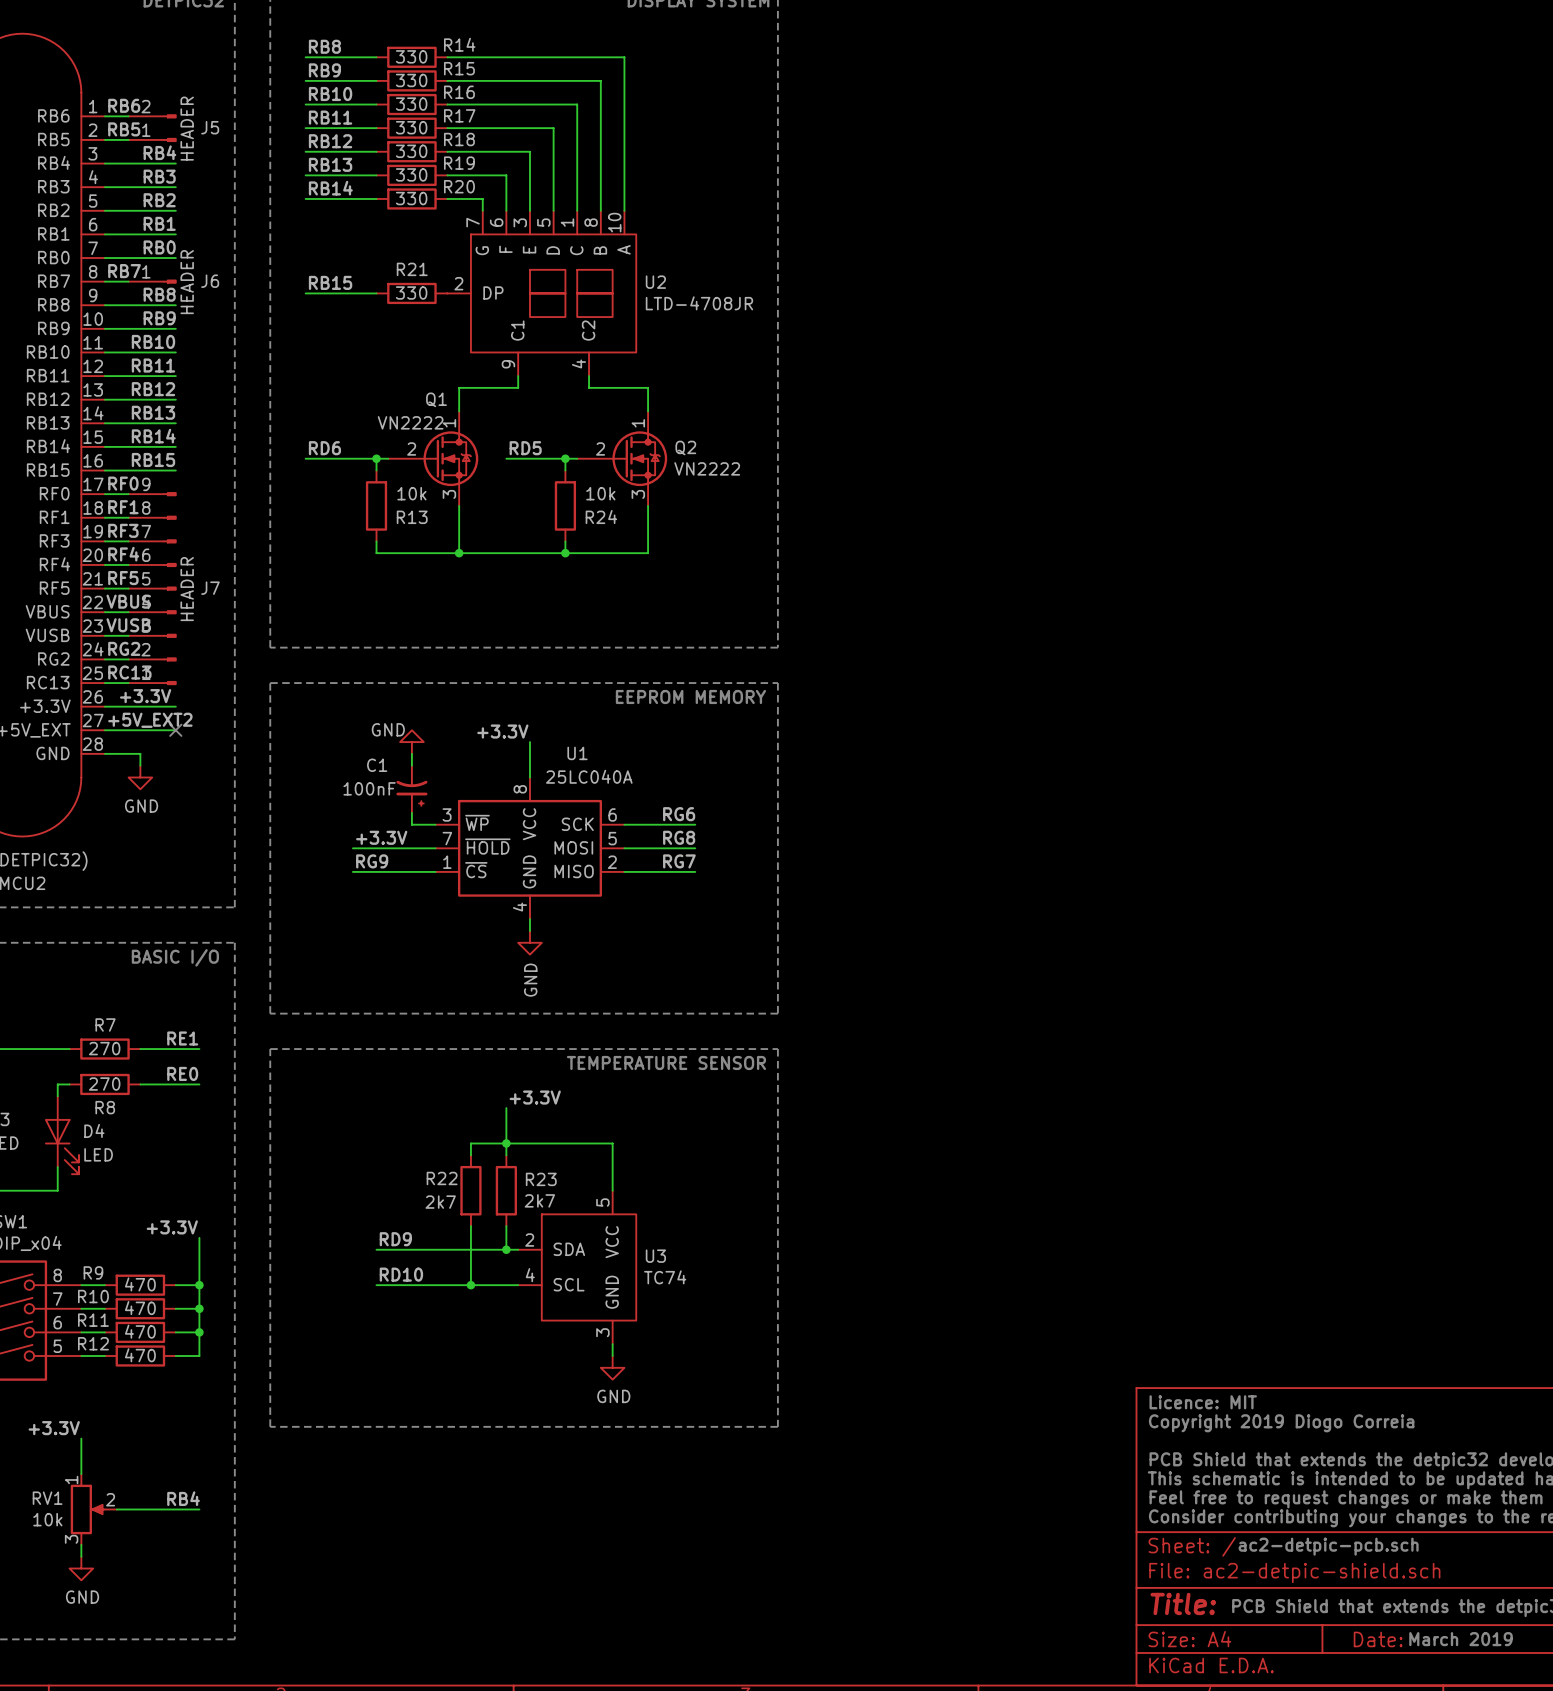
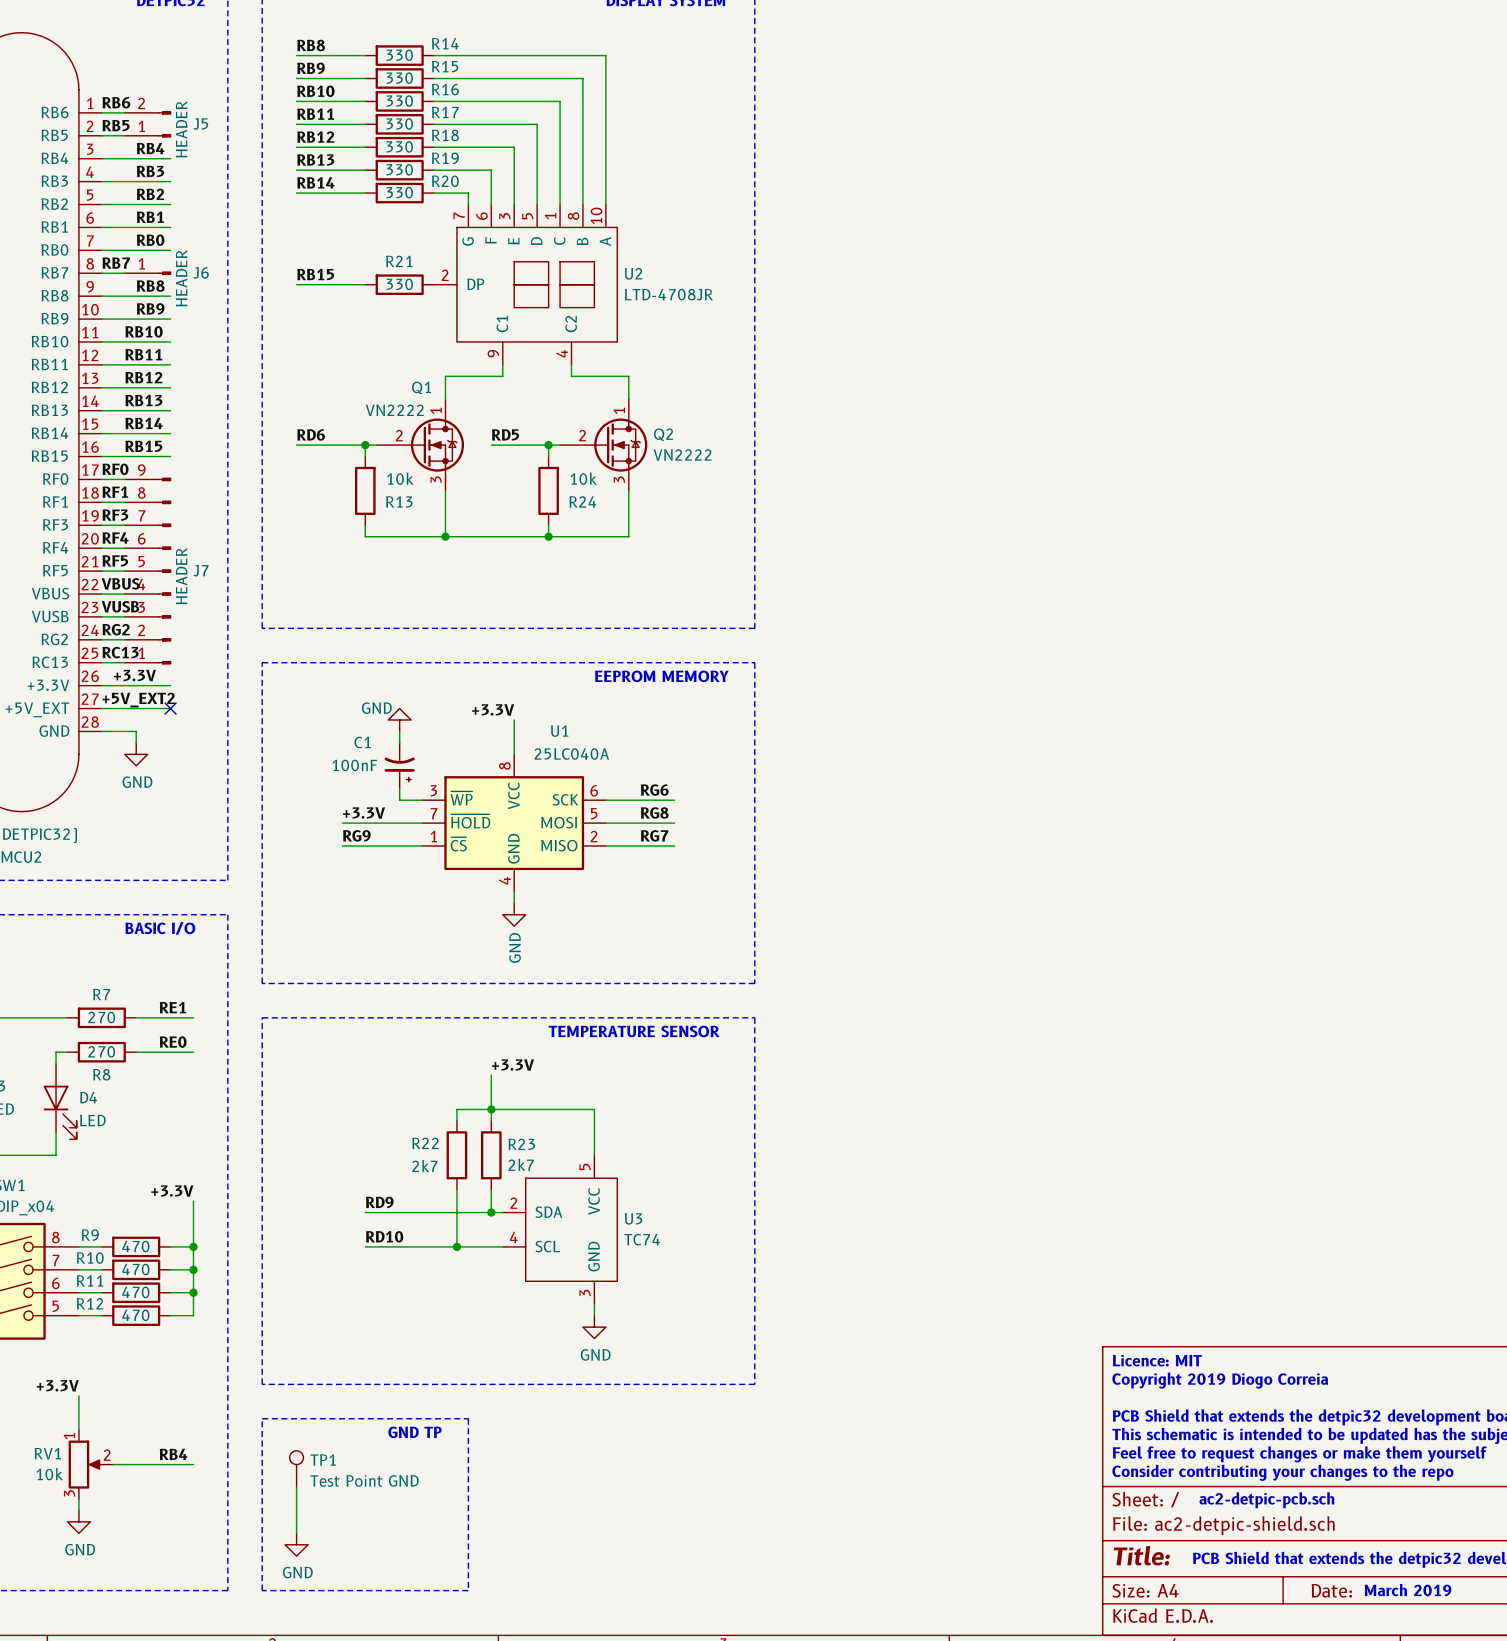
line: none -> (262, 1418) (468, 1418) (468, 1590) (262, 1590) (262, 1418)
text: none -> GND TP (415, 1432)
TP1: none -> Test Point GND (296, 1469)
wire: none -> (296, 1487) (296, 1533)
power symbol: none -> GND (296, 1544)

